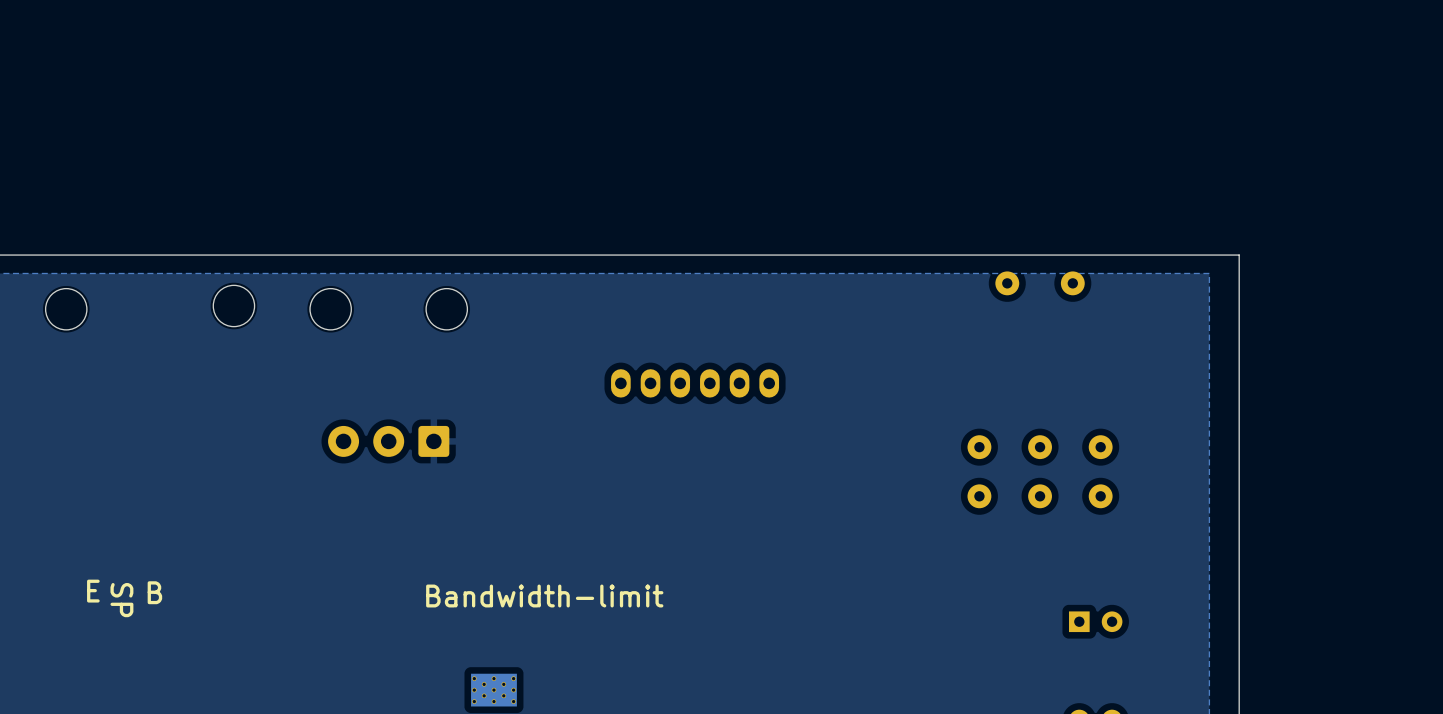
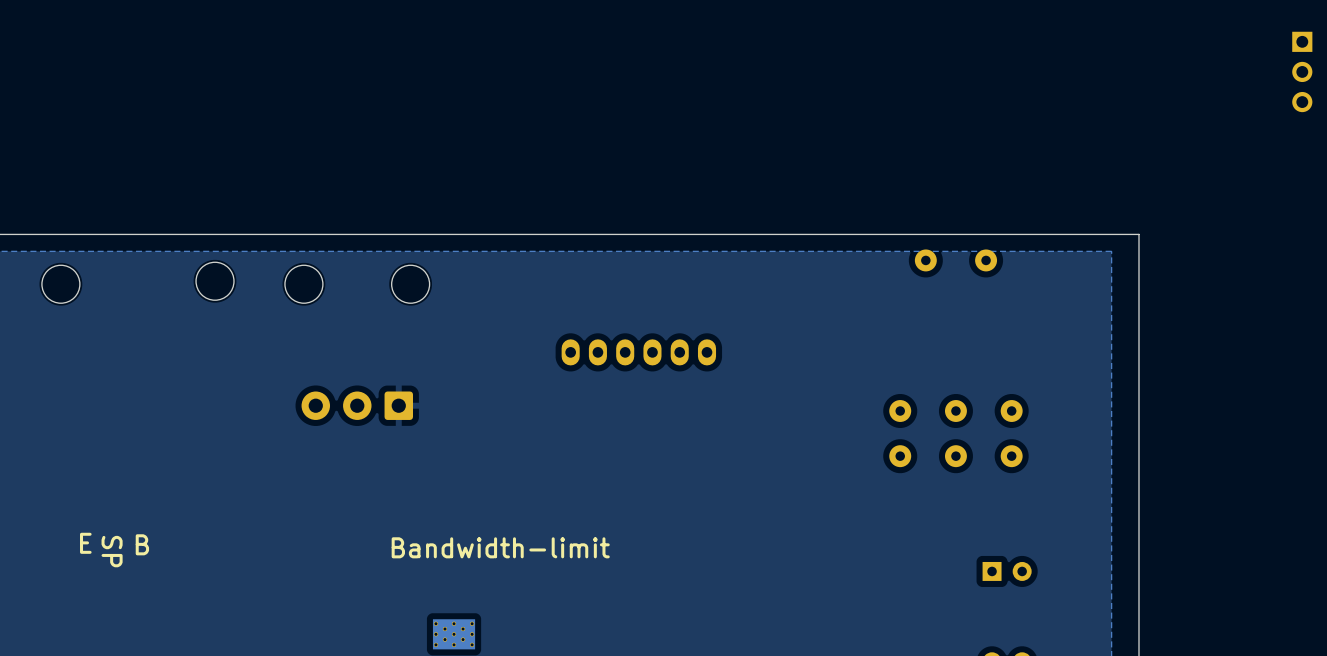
part: none -> (1302, 71)

